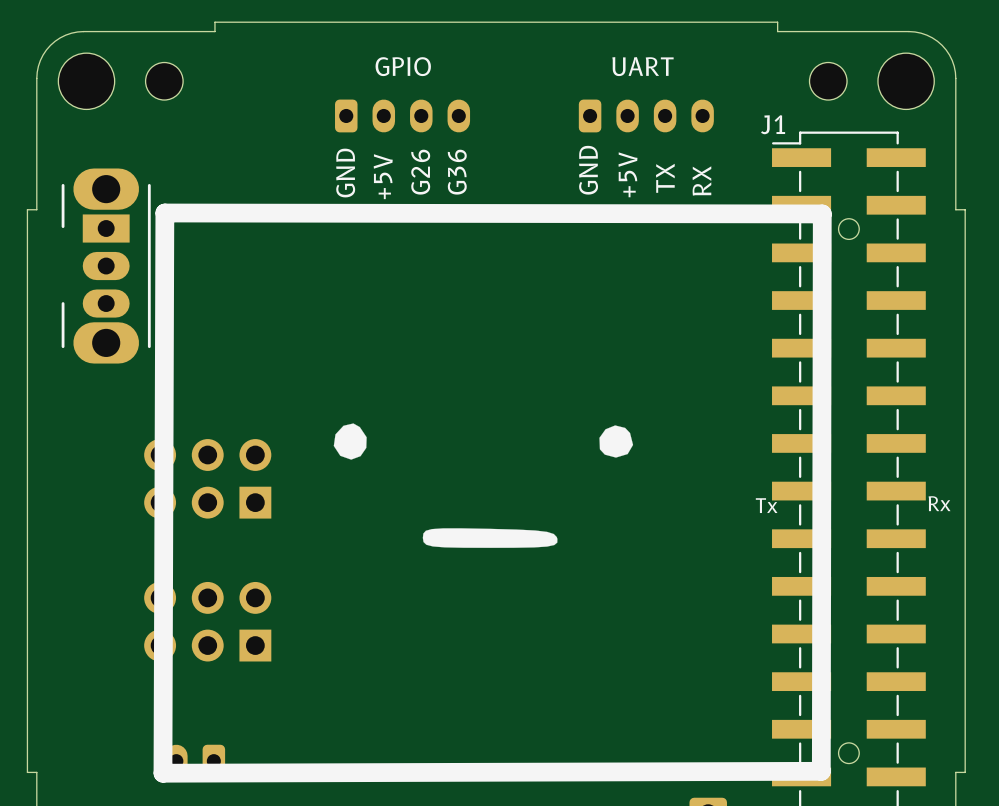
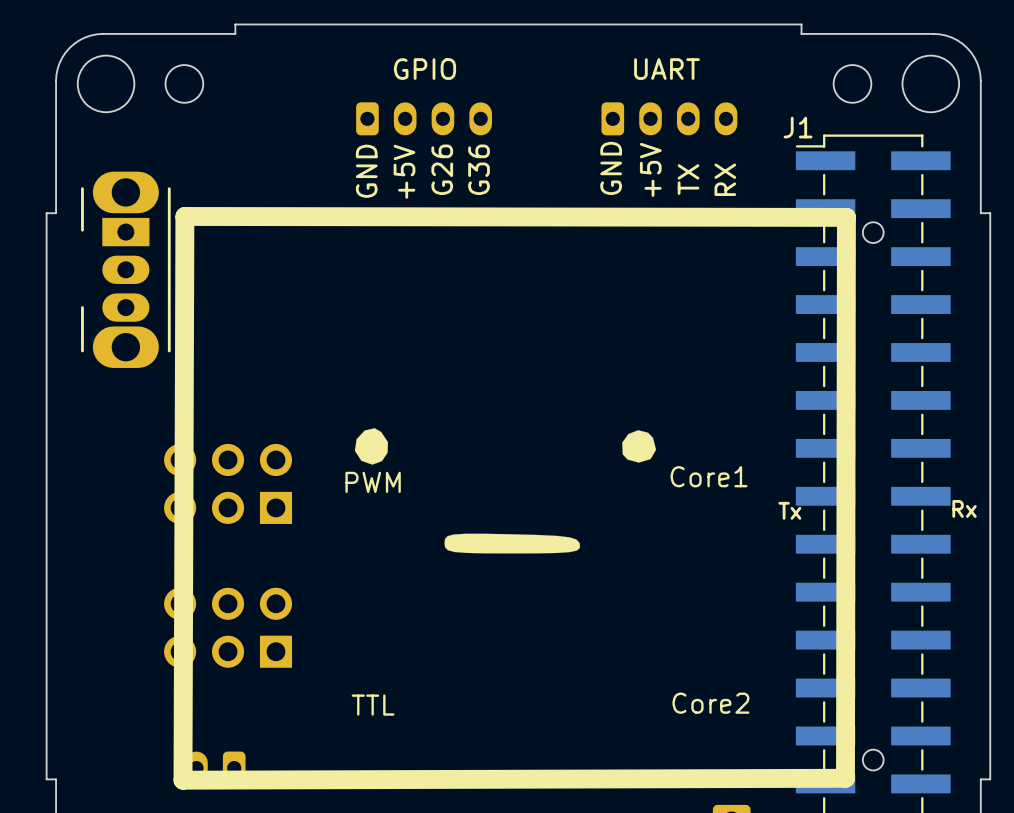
text: none -> Core1 (709, 476)
text: none -> PWM (373, 482)
text: none -> Core2 (710, 703)
text: none -> TTL (373, 705)

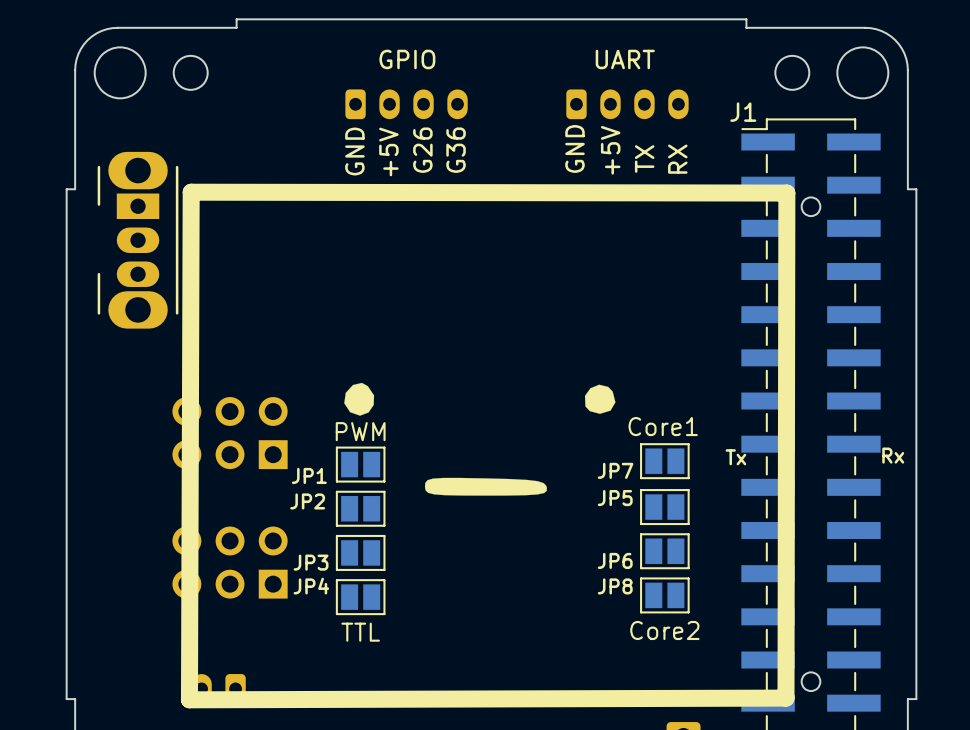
JP7: none -> (664, 461)
JP1: none -> (360, 464)
JP5: none -> (664, 507)
JP2: none -> (360, 508)
JP6: none -> (664, 551)
JP3: none -> (360, 552)
JP8: none -> (664, 595)
JP4: none -> (360, 597)

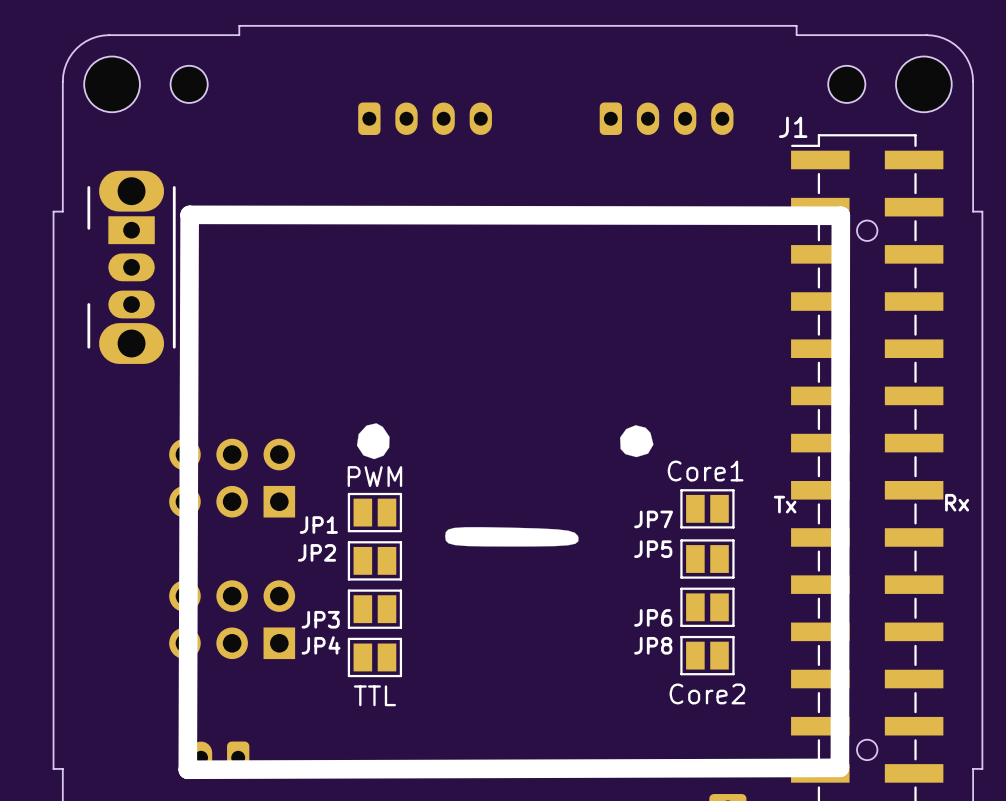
text: GPIO (407, 59) -> none
text: UART (625, 59) -> none
text: GND (574, 148) -> none
text: G26 (422, 150) -> none
text: G36 (456, 150) -> none
text: +5V (610, 150) -> none
text: GND (354, 151) -> none
text: +5V (388, 151) -> none
text: TX (644, 158) -> none
text: RX (677, 159) -> none

